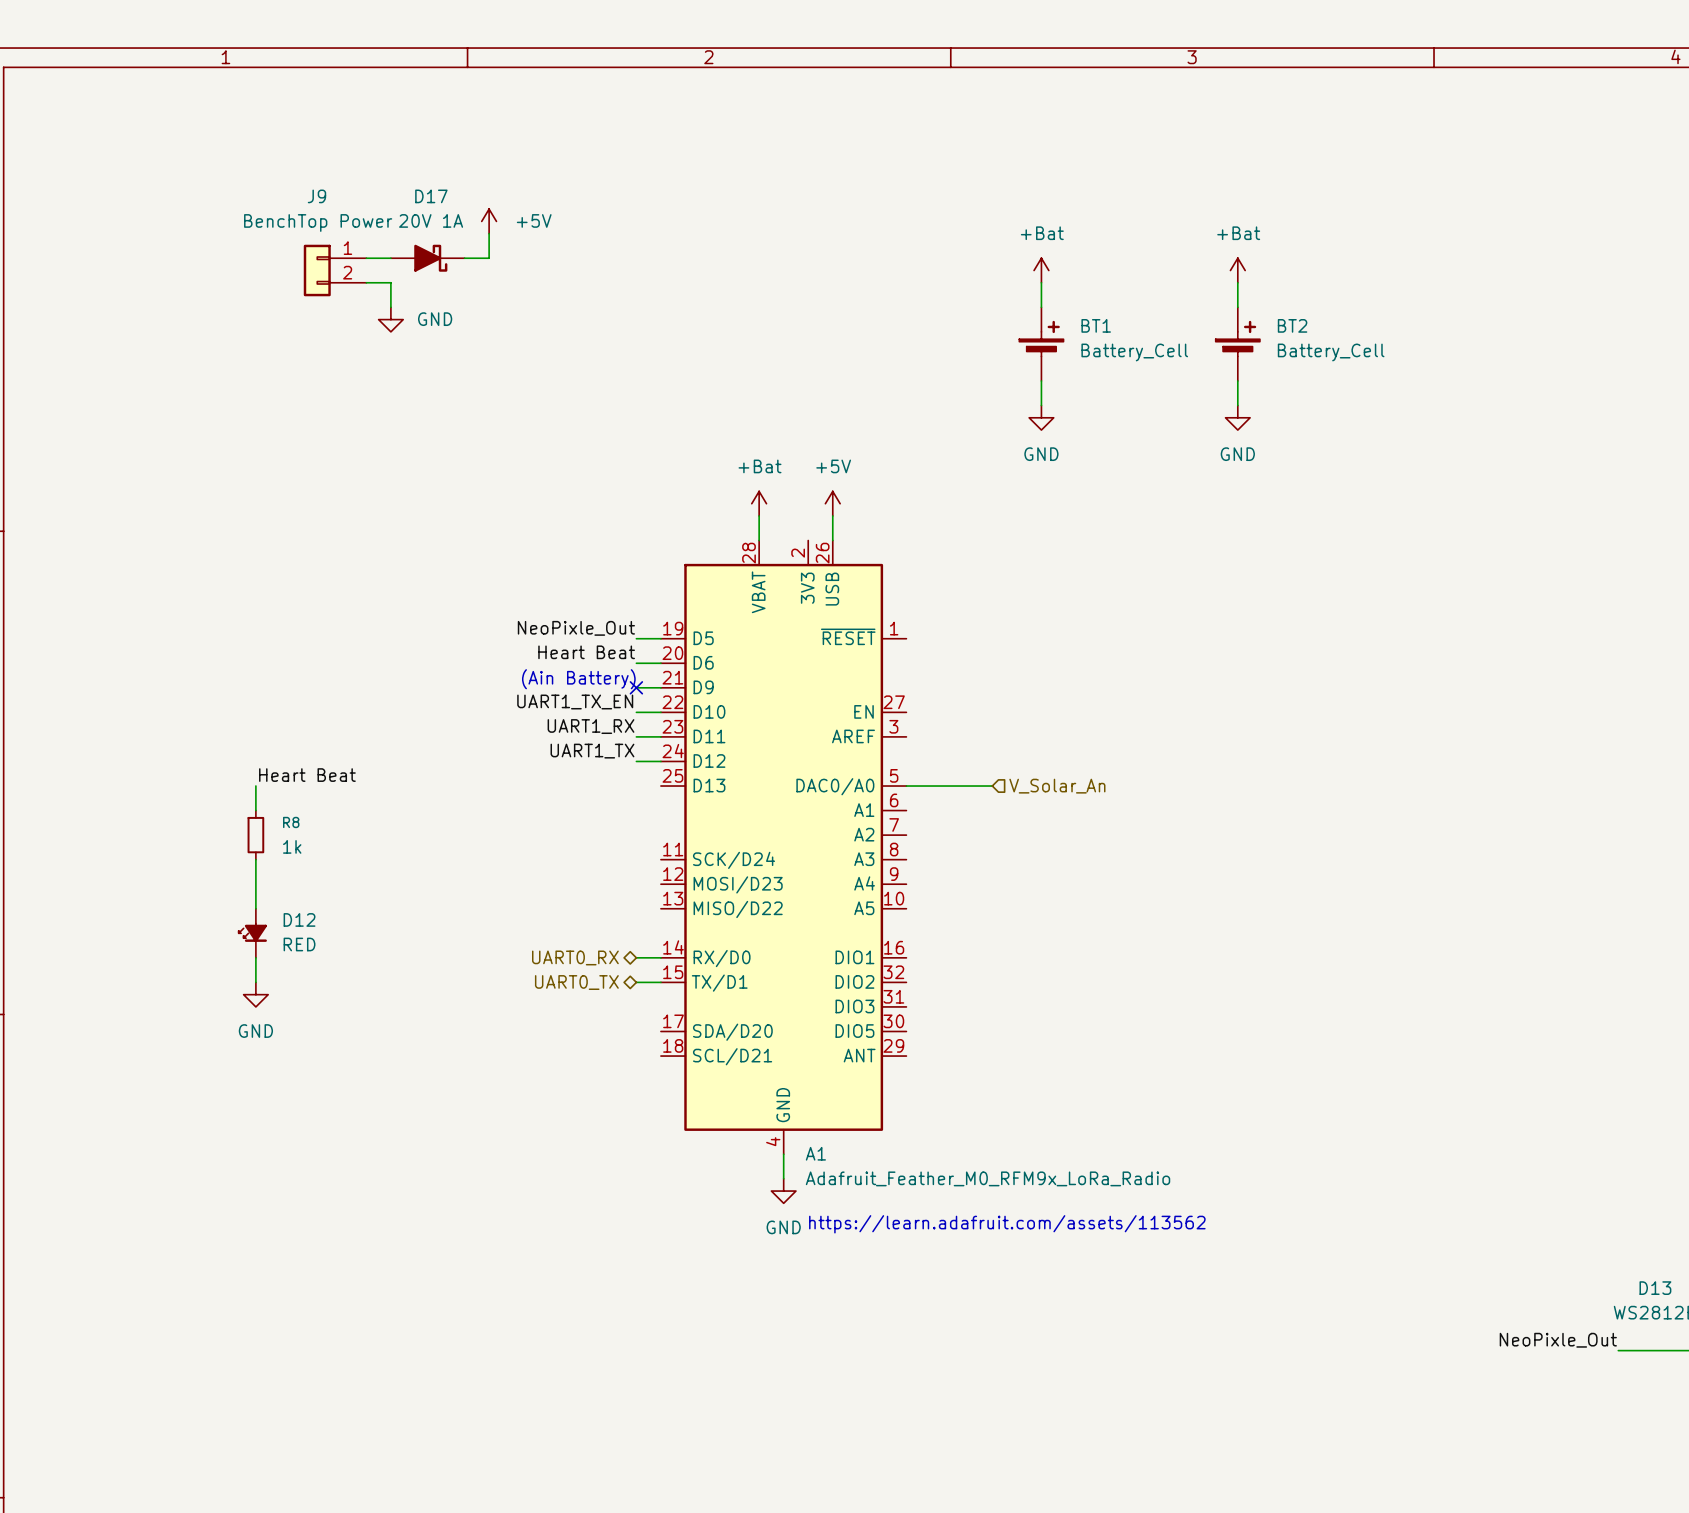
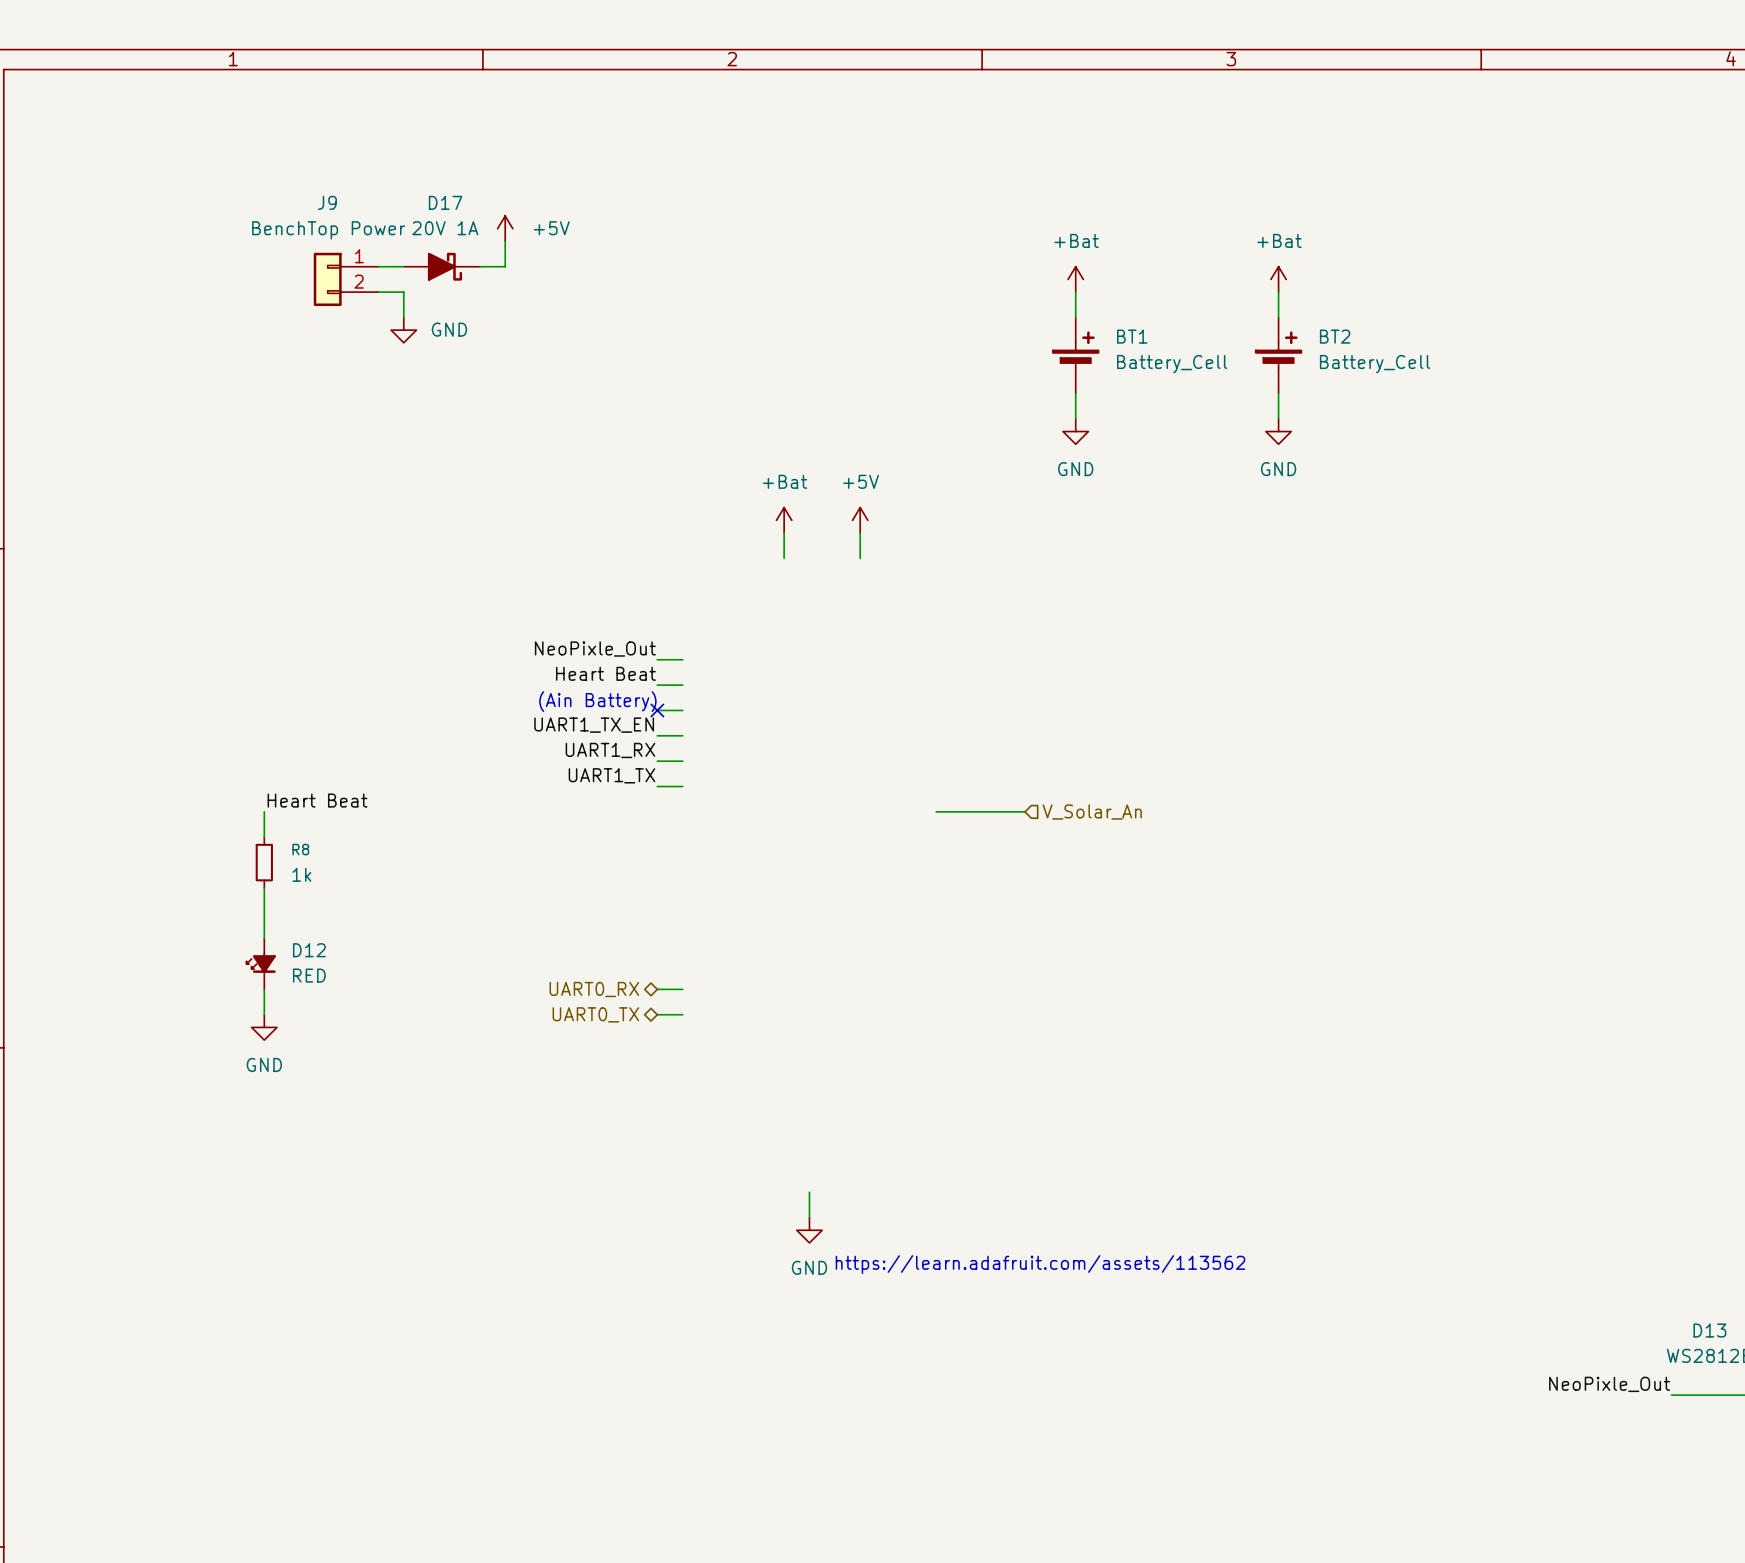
A1: Adafruit_Feather_M0_RFM9x_LoRa_Radio (783, 847) -> none

